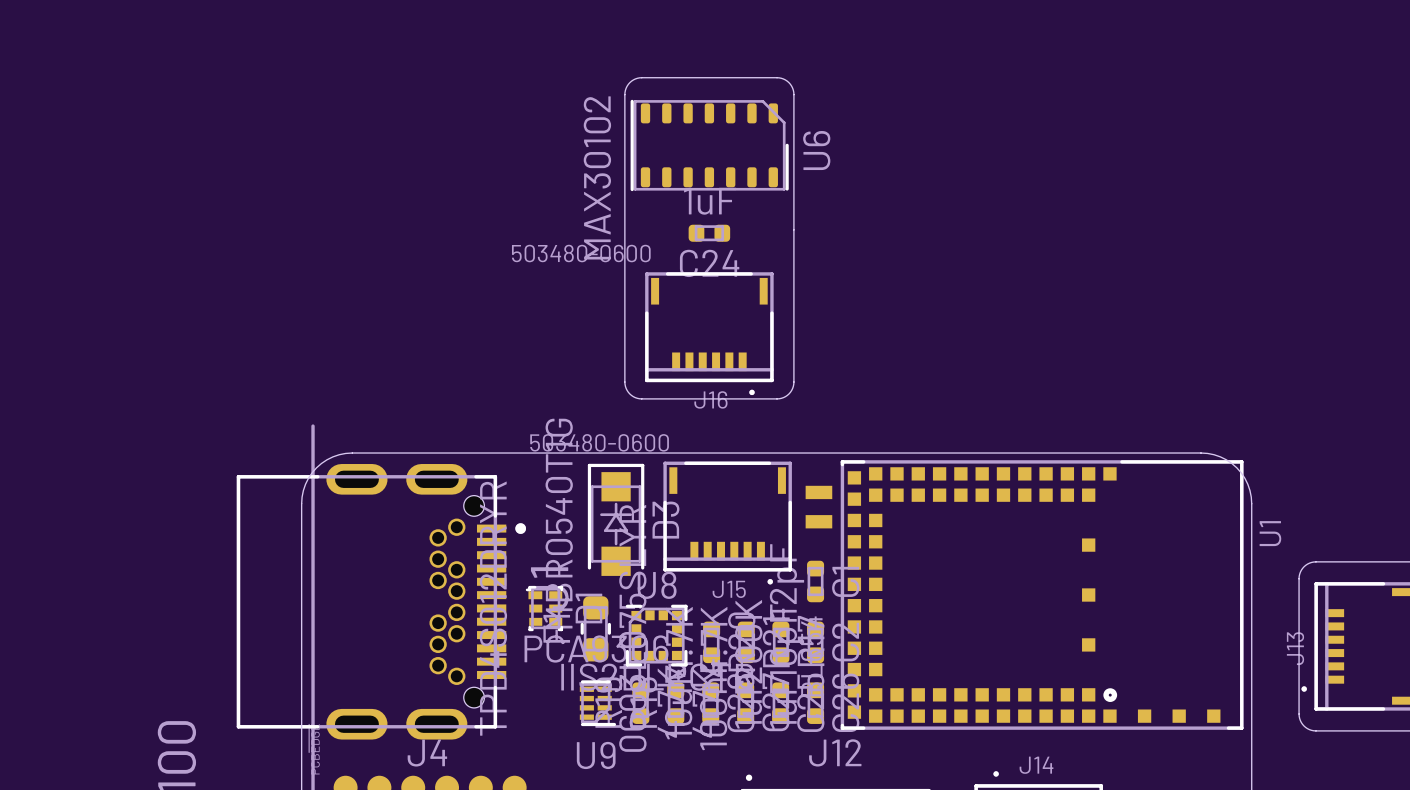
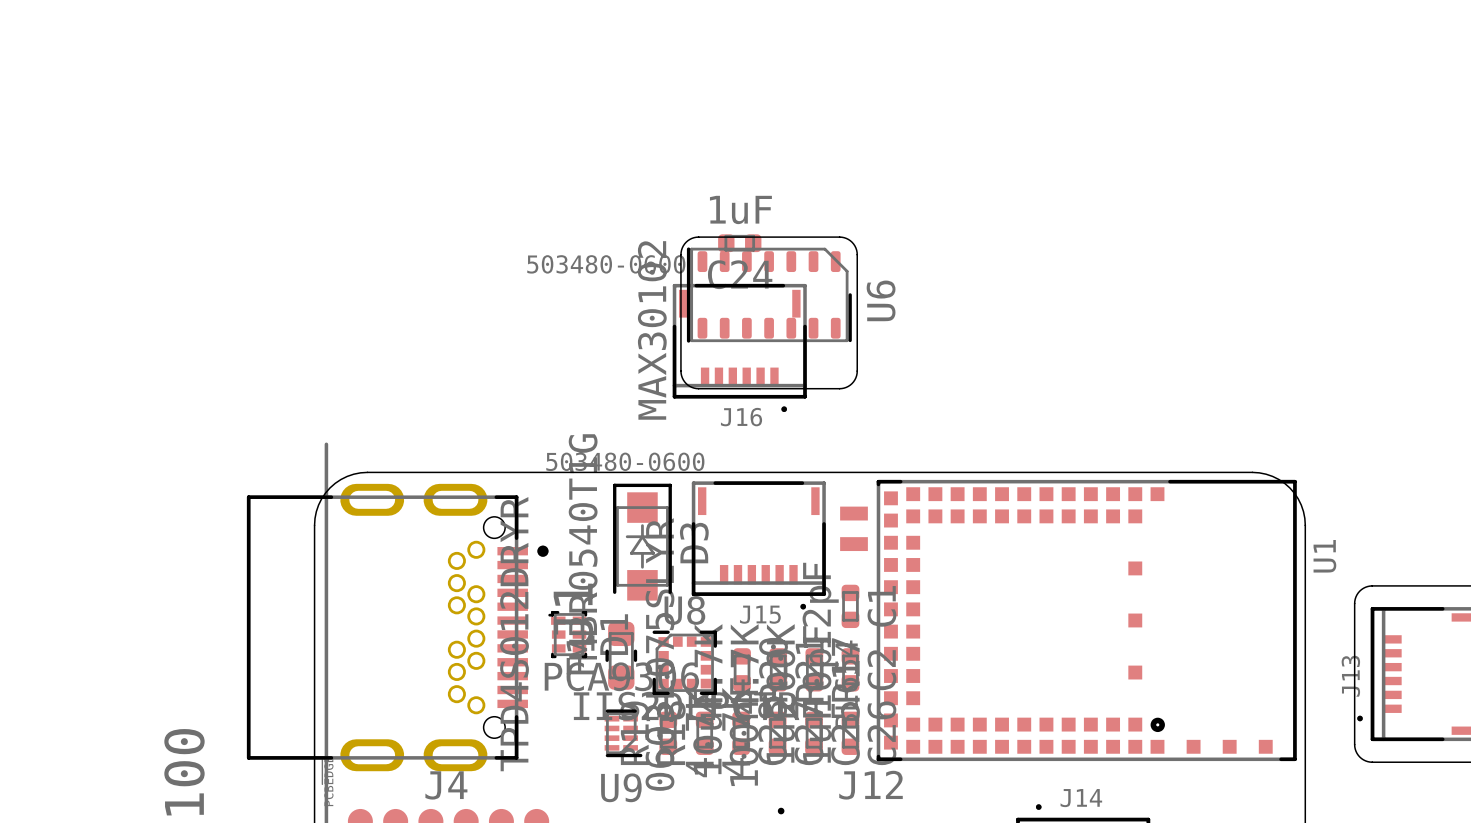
board edge: (641, 77) (779, 77) (787, 81) (792, 88) (793, 382) (791, 390) (783, 397) (641, 398) (631, 395) (626, 388) (624, 94) (629, 82) (641, 77) -> none
U6 position: (709, 145) -> (769, 295)
board edge: none -> (698, 237) (839, 237) (852, 242) (857, 254) (857, 371) (852, 383) (839, 388) (698, 388) (686, 383) (680, 371) (681, 252) (687, 240) (698, 237)

